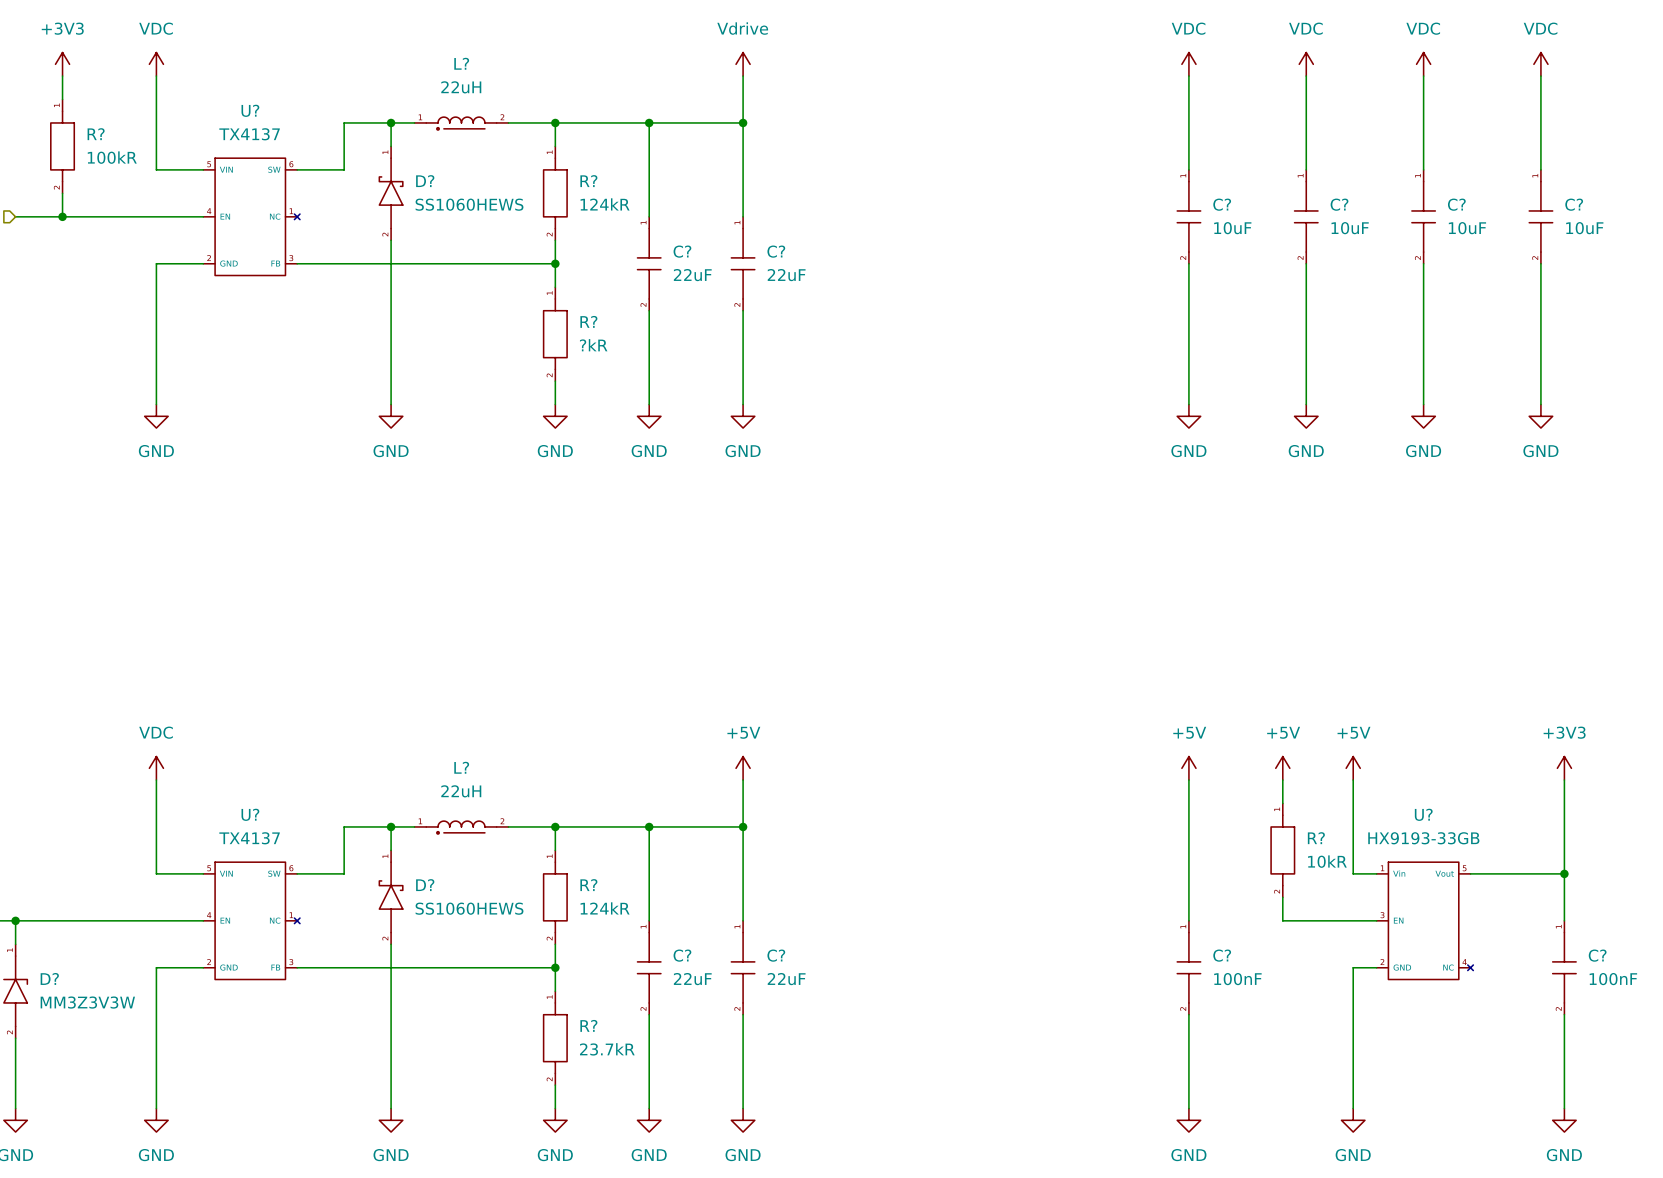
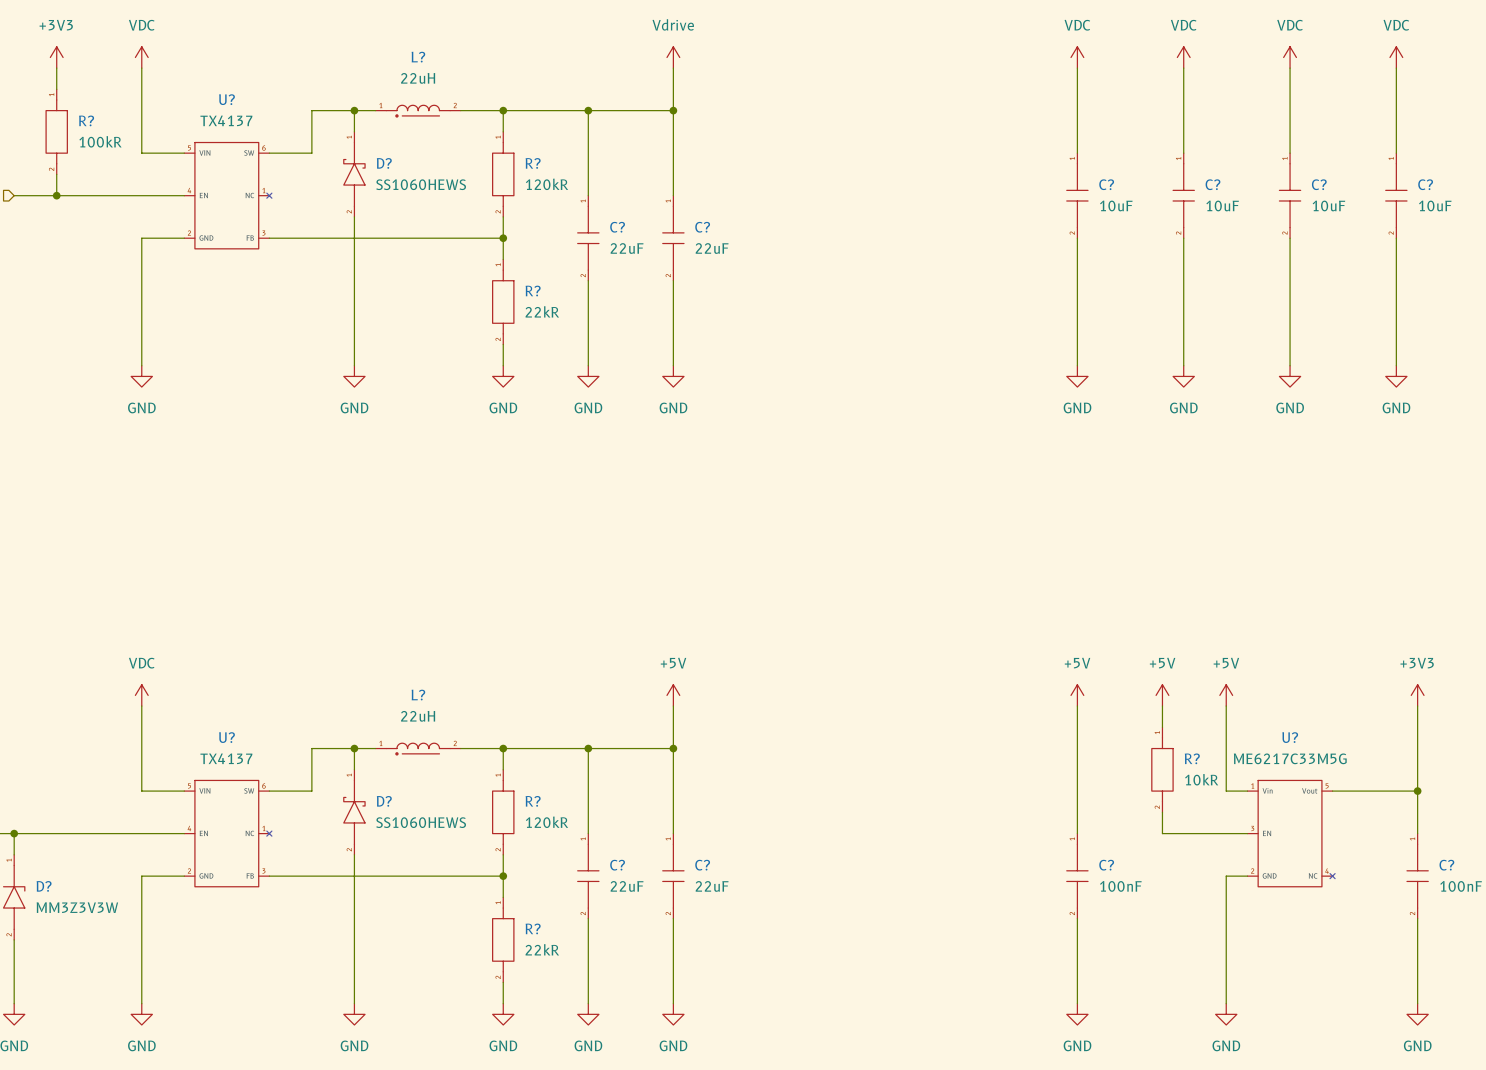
R? value: 124kR (605, 204) -> 120kR (547, 184)
R? value: ?kR (593, 345) -> 22kR (542, 311)
U? value: HX9193-33GB (1423, 838) -> ME6217C33M5G (1290, 758)
R? value: 124kR (605, 908) -> 120kR (547, 822)
R? value: 23.7kR (607, 1049) -> 22kR (542, 949)

